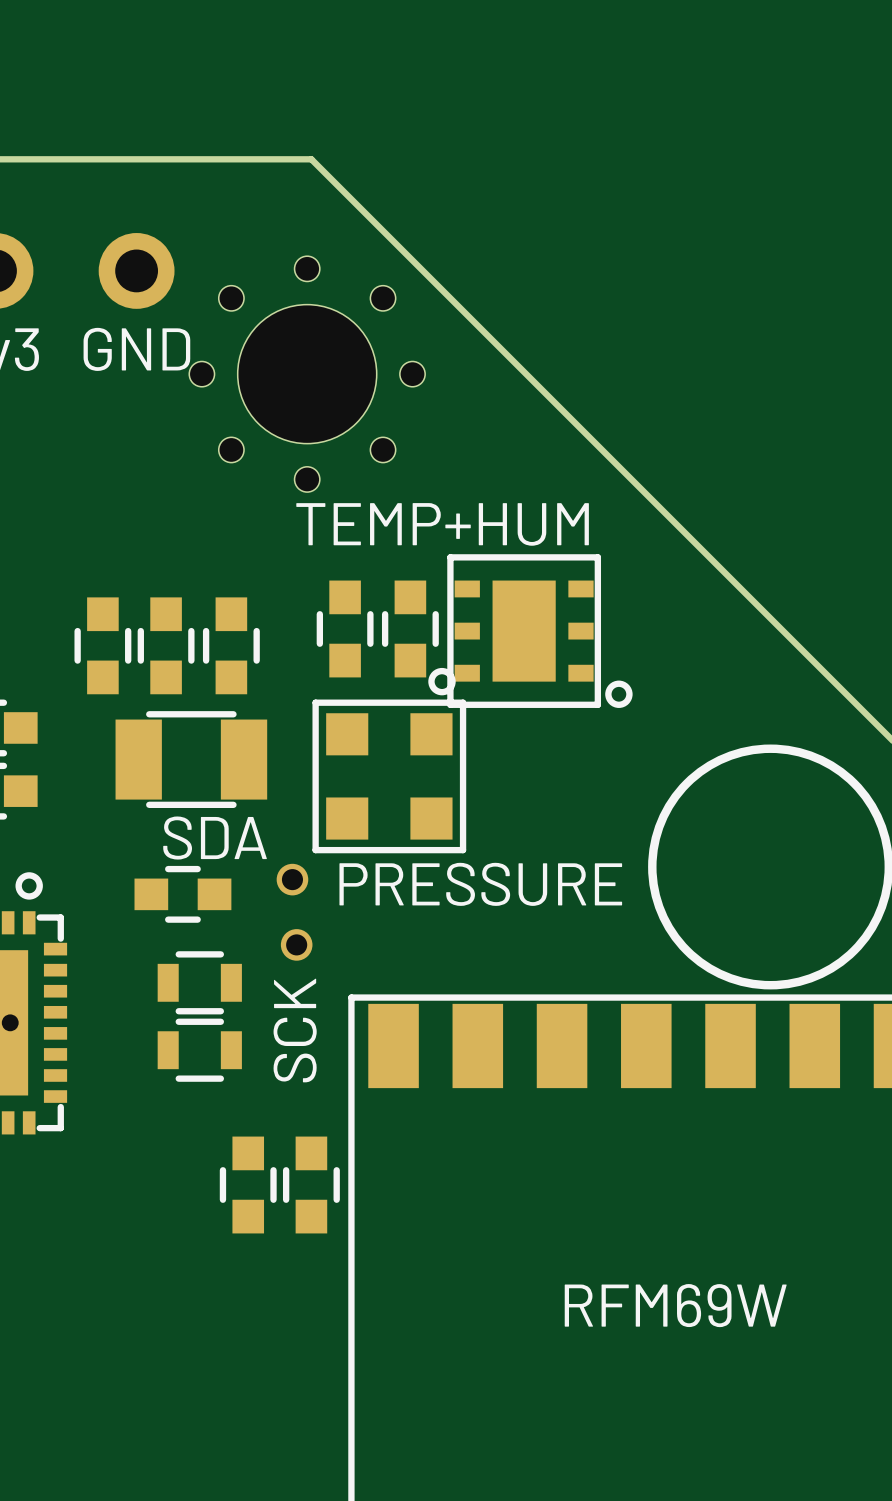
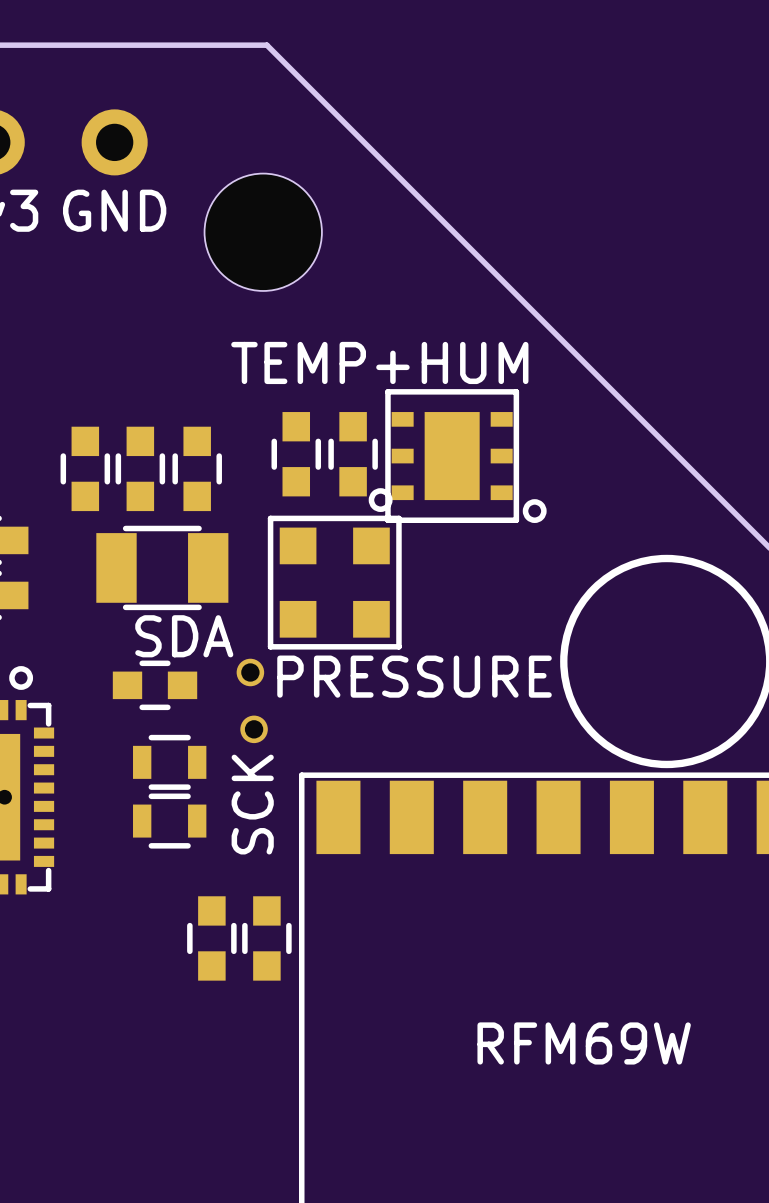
part footprint: [189, 256, 426, 493] -> [204, 173, 322, 291]

